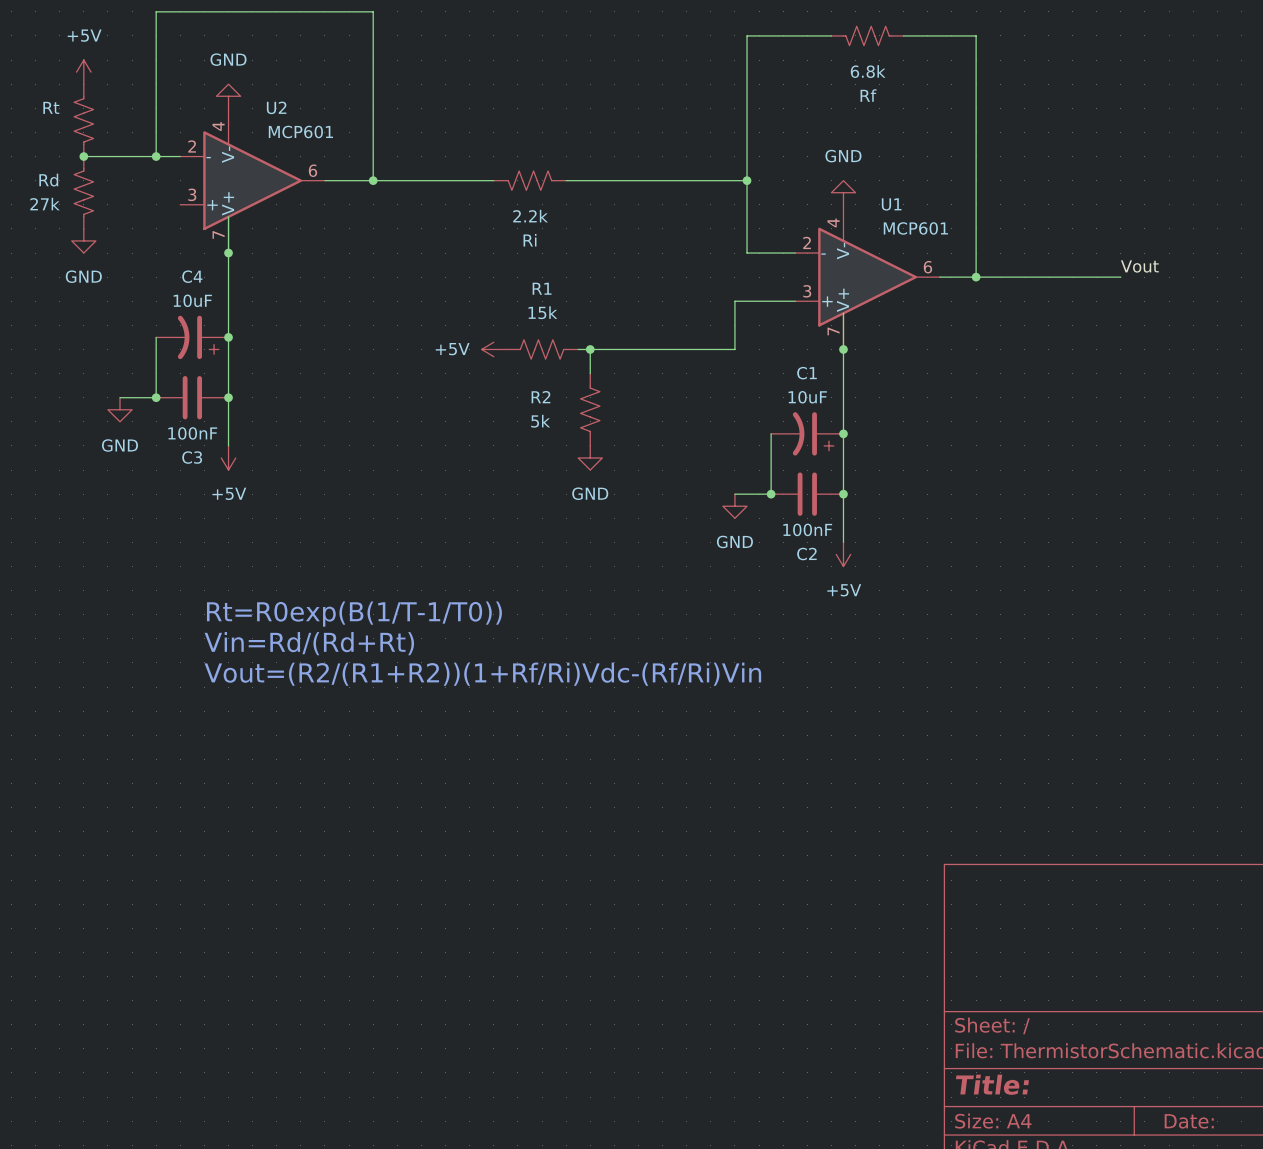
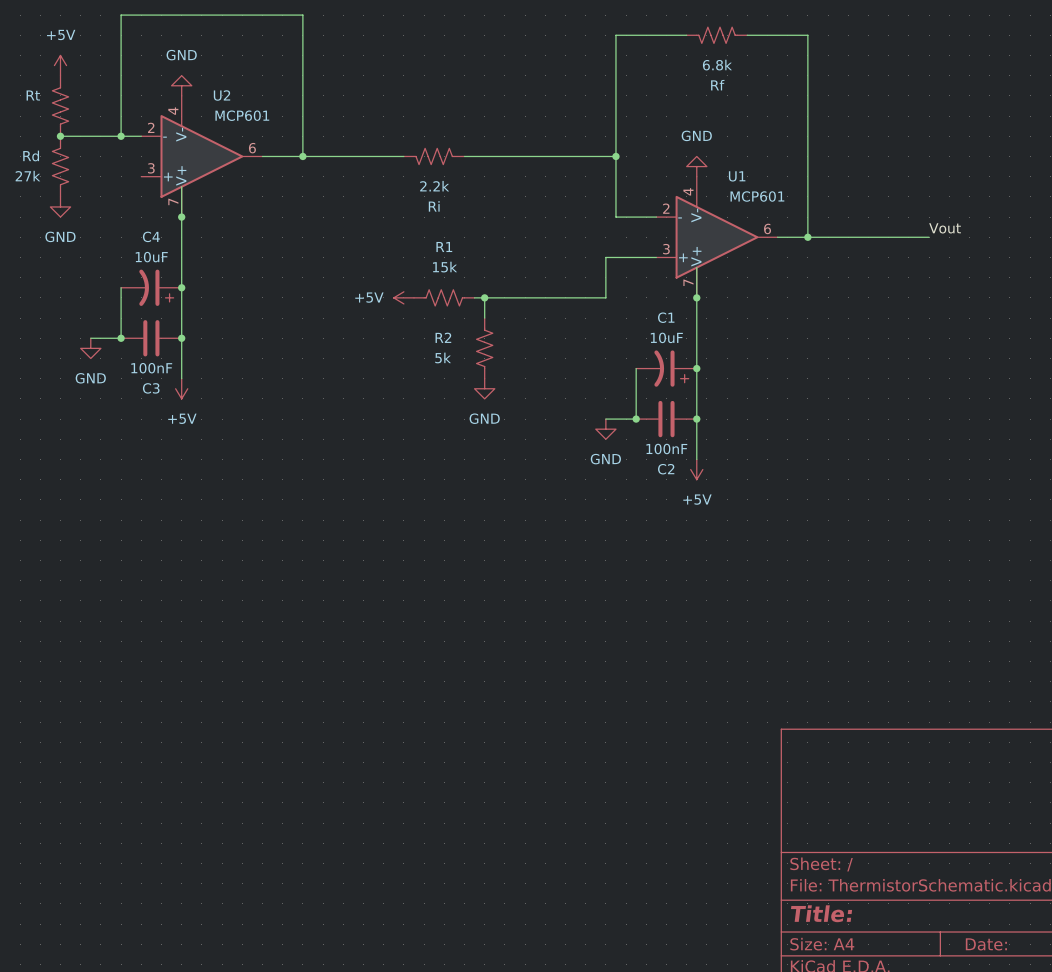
text: Rt=R0exp(B(1/T-1/T0)) (354, 614) -> none
text: Vin=Rd/(Rd+Rt) (309, 643) -> none
text: Vout=(R2/(R1+R2))(1+Rf/Ri)Vdc-(Rf/Ri)Vin (482, 674) -> none

